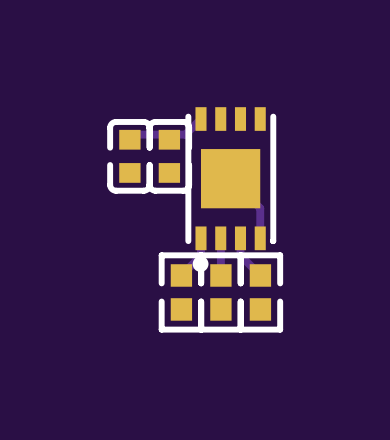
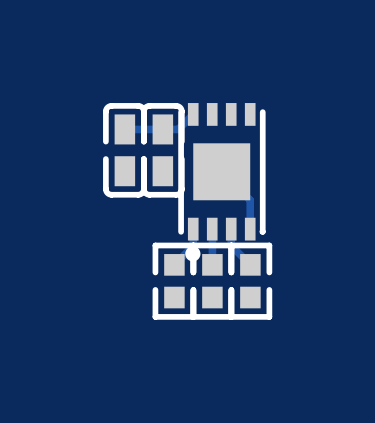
part footprint: [107, 119, 153, 194] -> [103, 103, 147, 198]
part footprint: [146, 119, 193, 194] -> [141, 103, 185, 198]

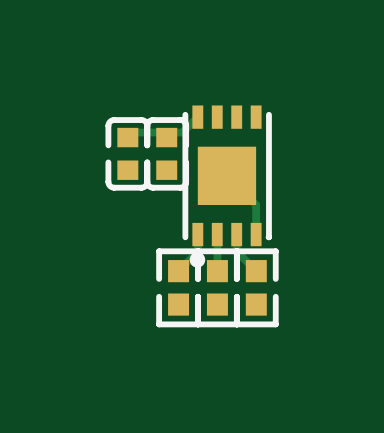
part footprint: [103, 103, 147, 198] -> [105, 117, 151, 191]
part footprint: [141, 103, 185, 198] -> [144, 117, 190, 191]

